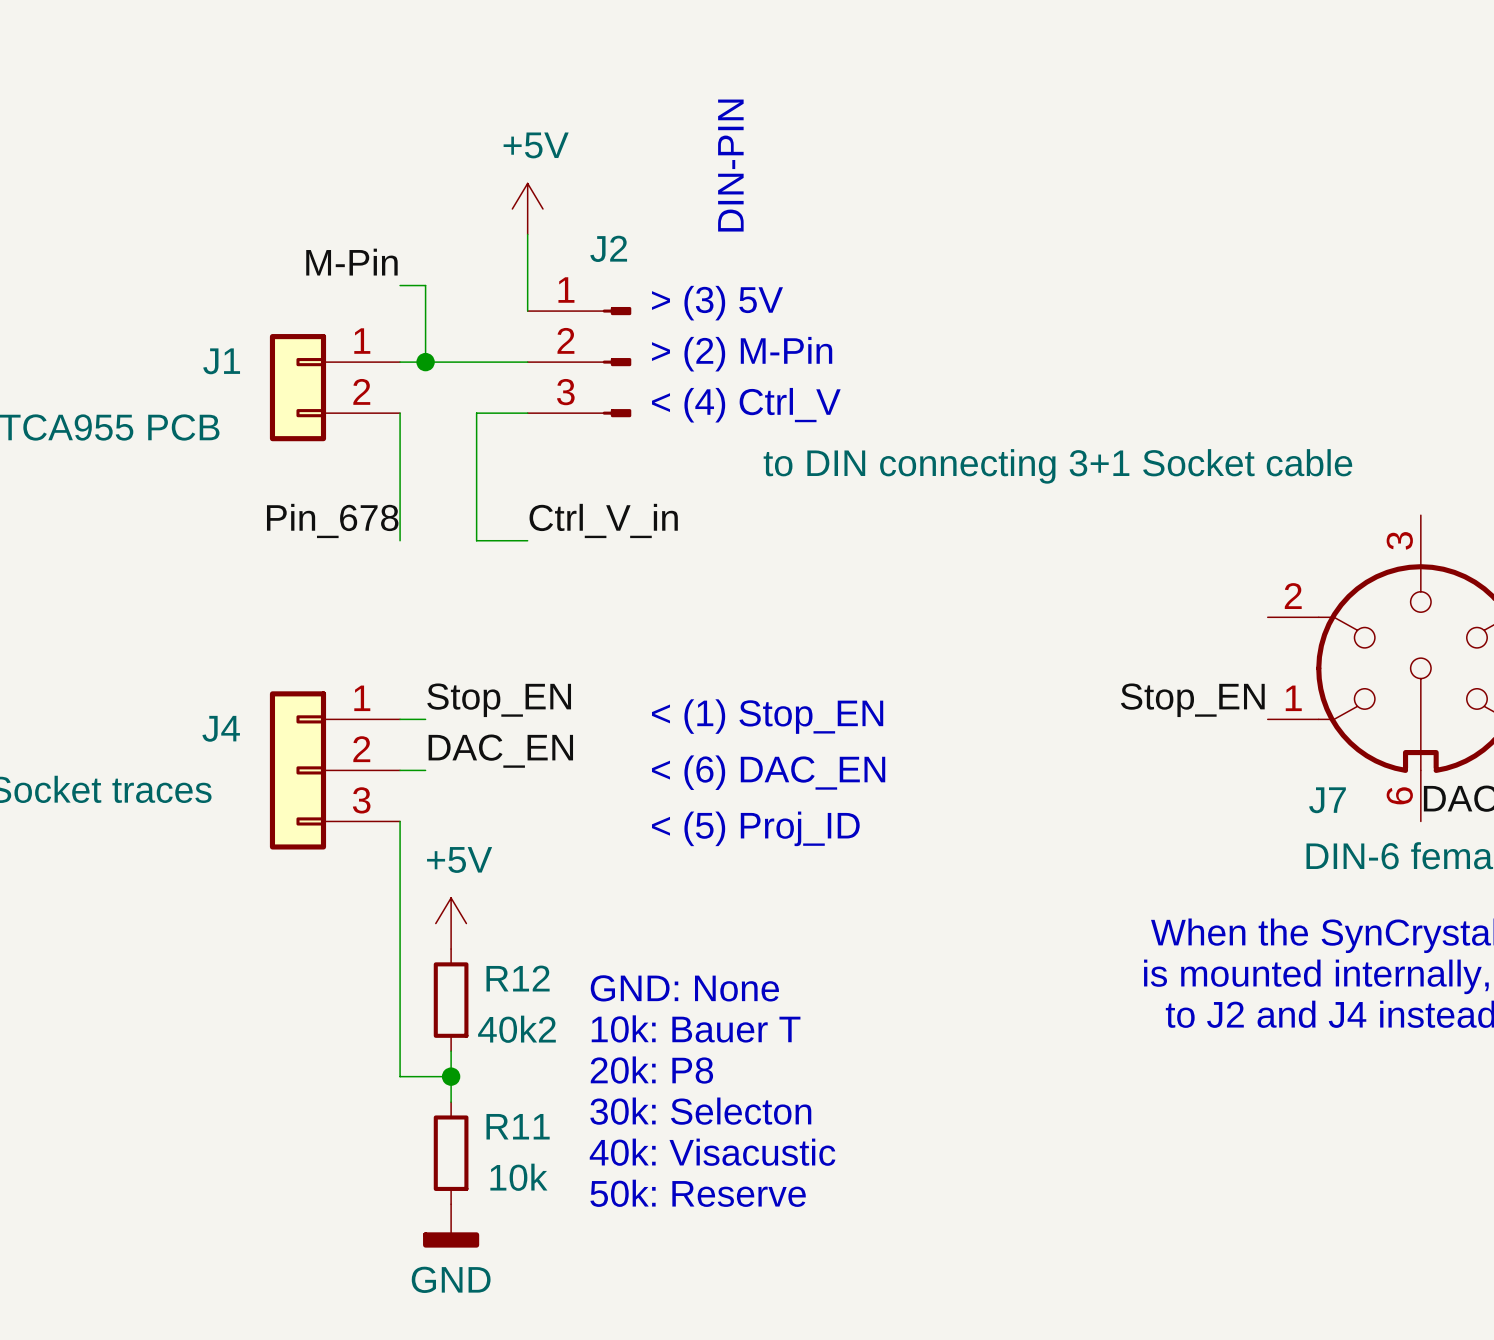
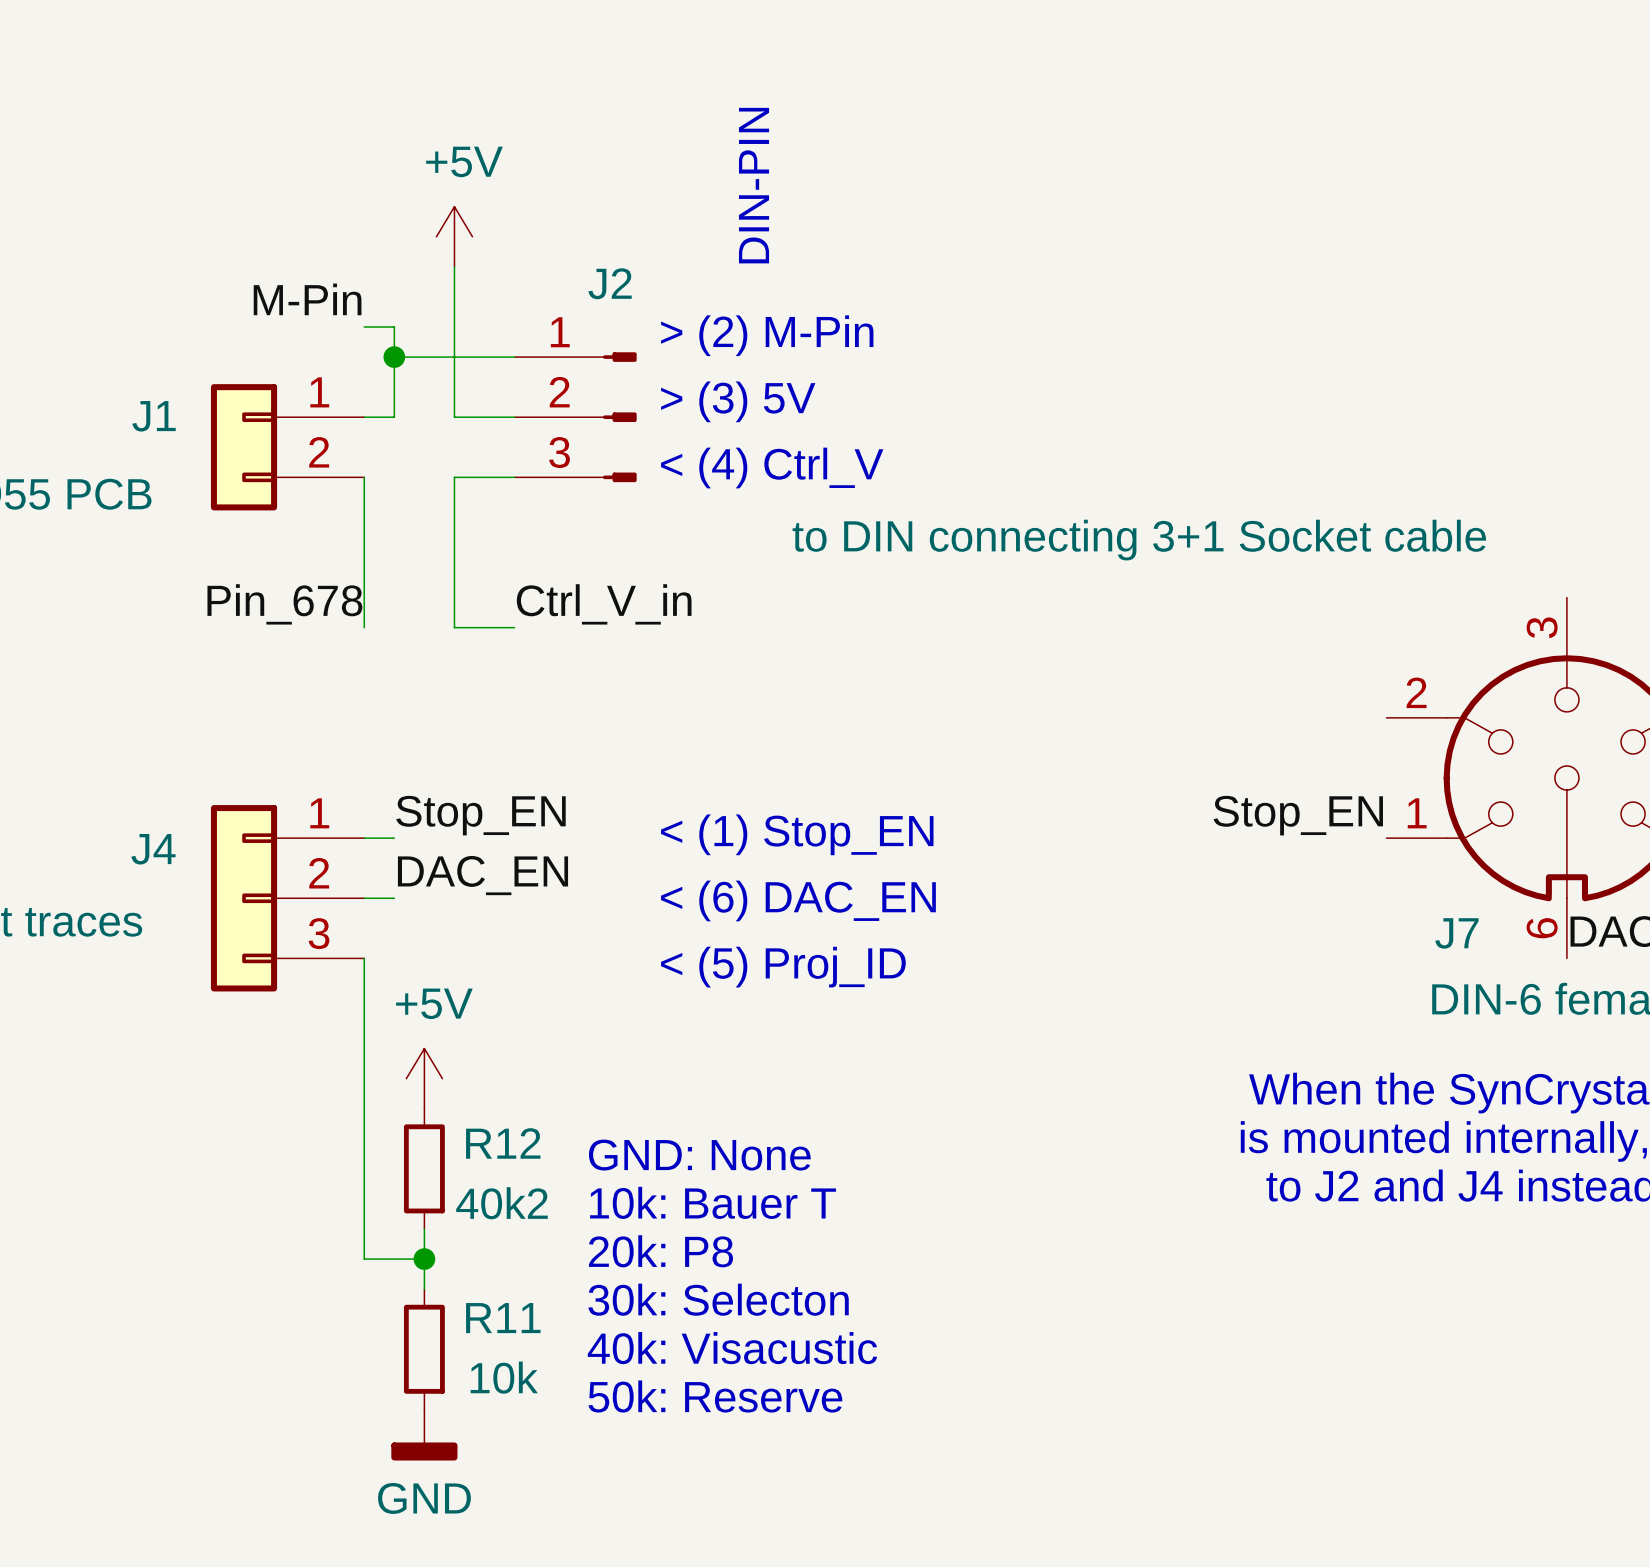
power symbol position: +5V (527, 208) -> +5V (454, 236)
wire: (527, 234) (527, 311) -> (394, 357) (514, 357)
text position: > (3) 5V (717, 303) -> > (3) 5V (738, 401)
text position: > (2) M-Pin (742, 354) -> > (2) M-Pin (767, 335)
wire: (425, 362) (476, 362) -> (454, 266) (454, 417)
junction position: (425, 362) -> (394, 357)

